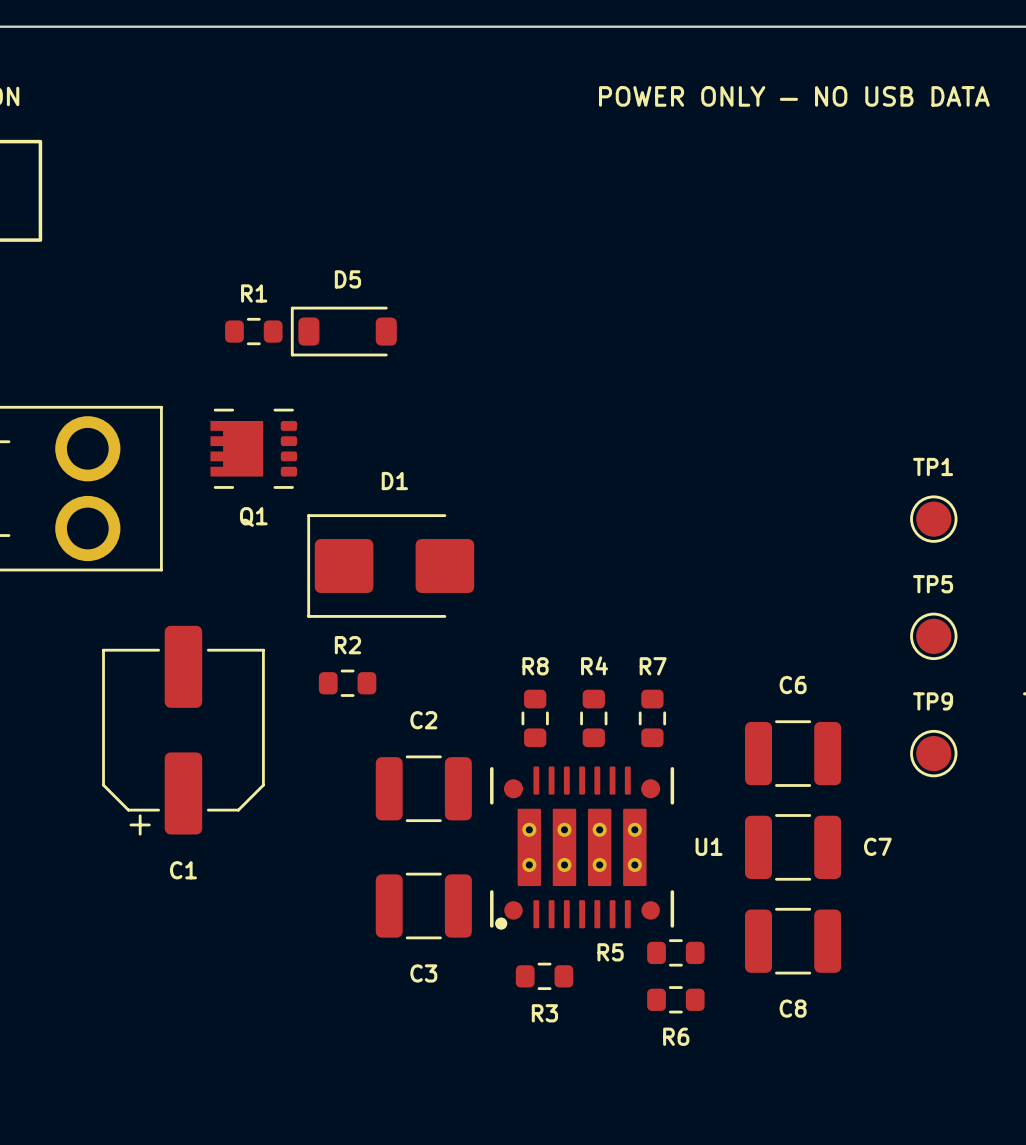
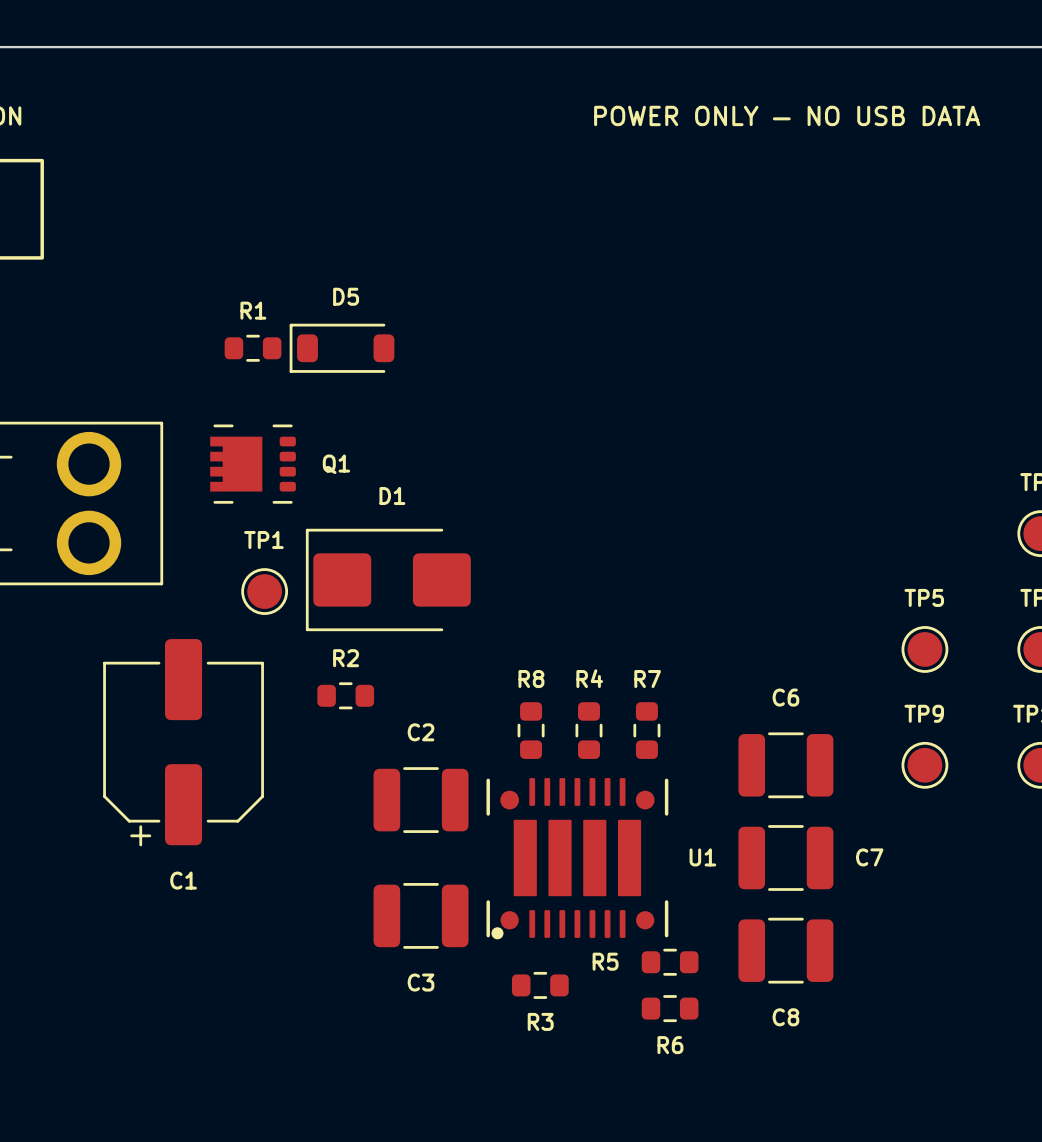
Q1 name position: Q1 (253, 516) -> Q1 (336, 464)
TP1 position: (933, 519) -> (264, 591)
U1 footprint: [490, 766, 675, 930] -> [486, 778, 669, 940]

